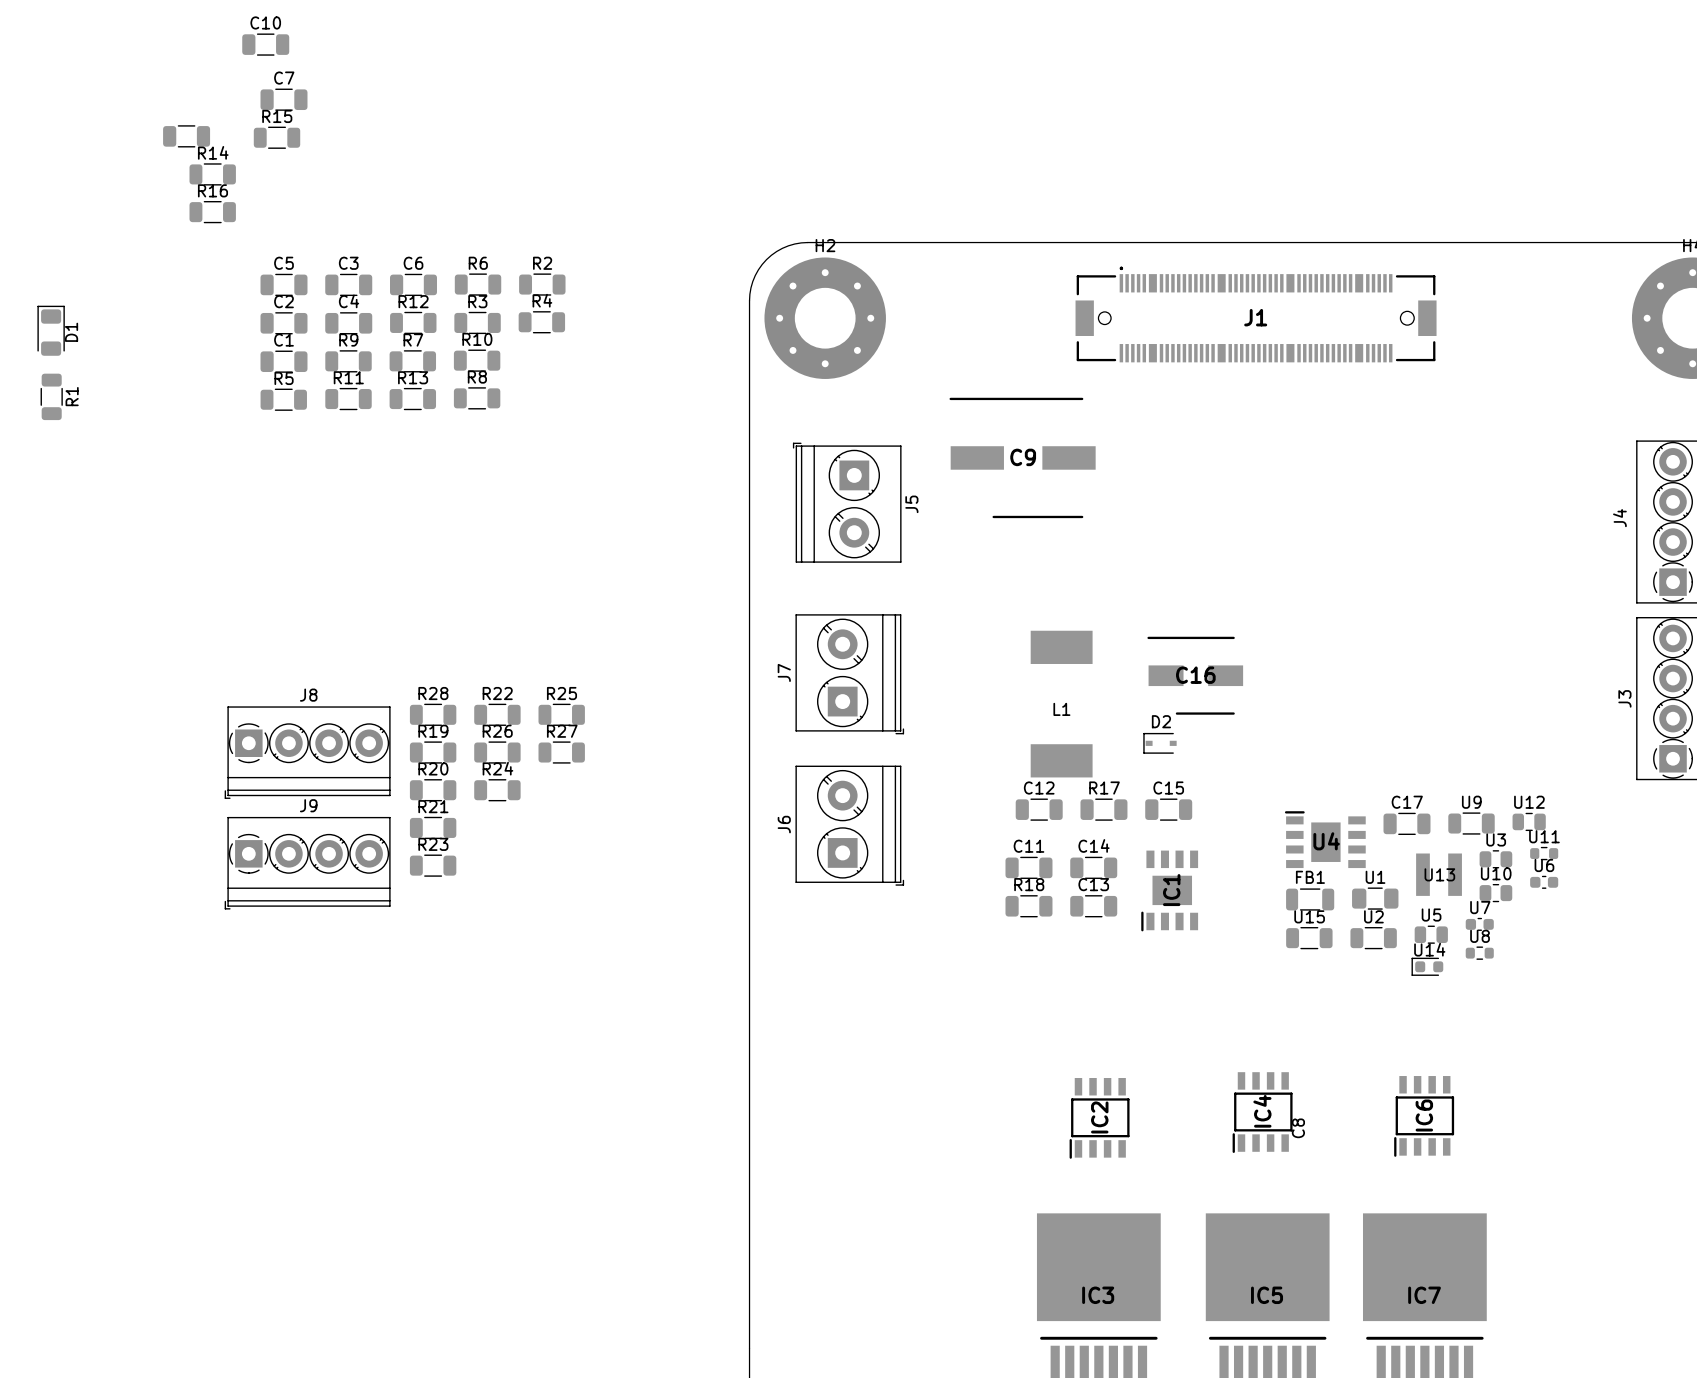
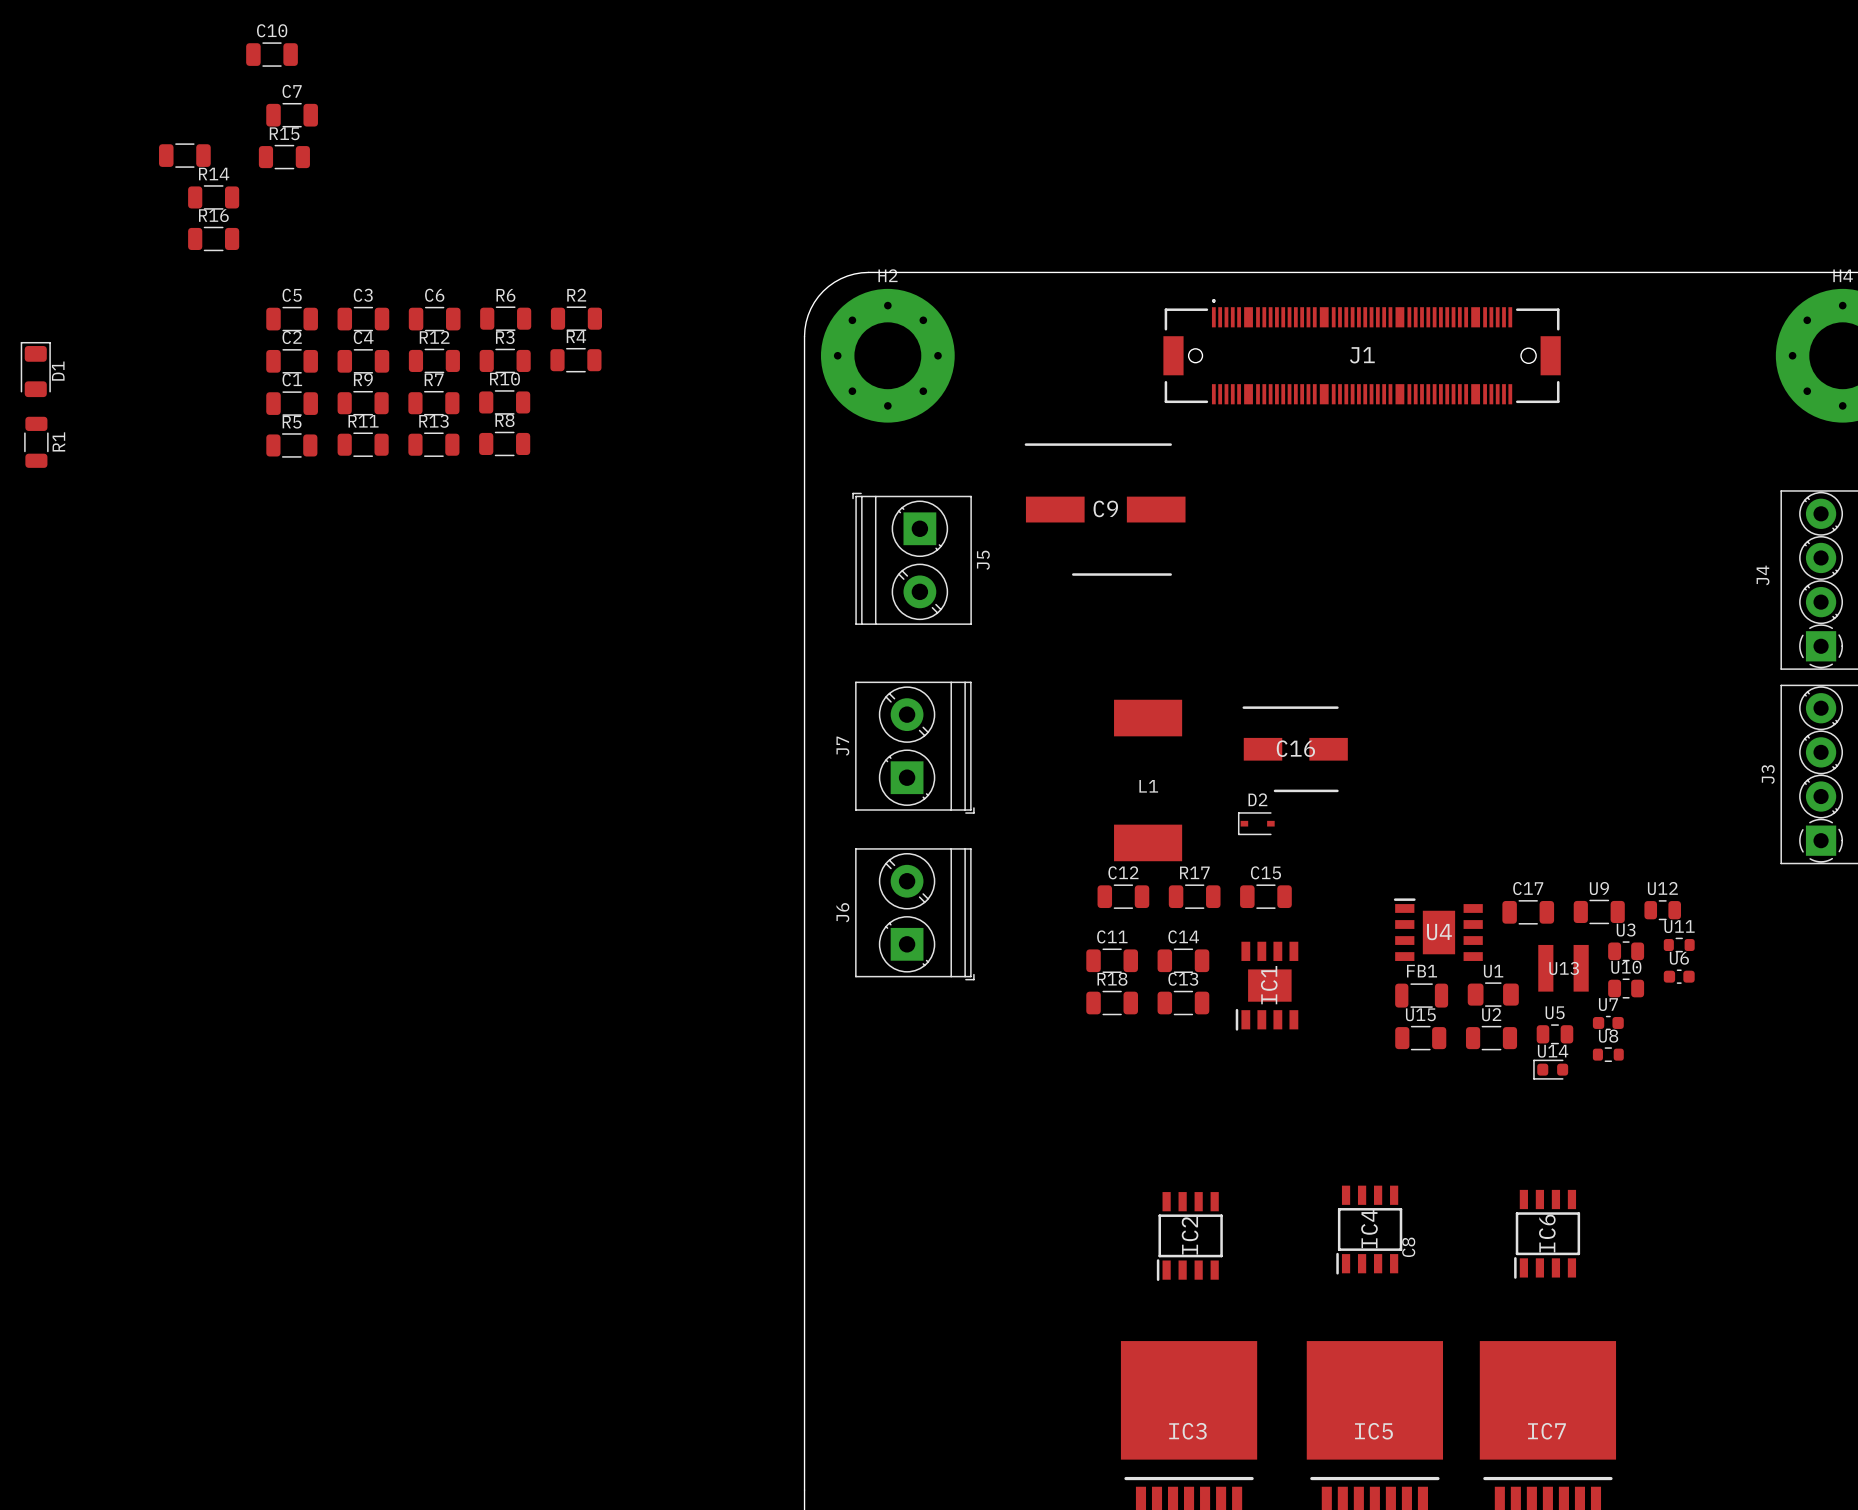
R28: (433, 714) -> none
R22: (497, 714) -> none
R25: (561, 714) -> none
J8: (307, 752) -> none
R19: (433, 752) -> none
R26: (497, 752) -> none
R27: (561, 752) -> none
R20: (433, 790) -> none
R24: (497, 790) -> none
R21: (433, 827) -> none
J9: (307, 863) -> none
R23: (433, 865) -> none

